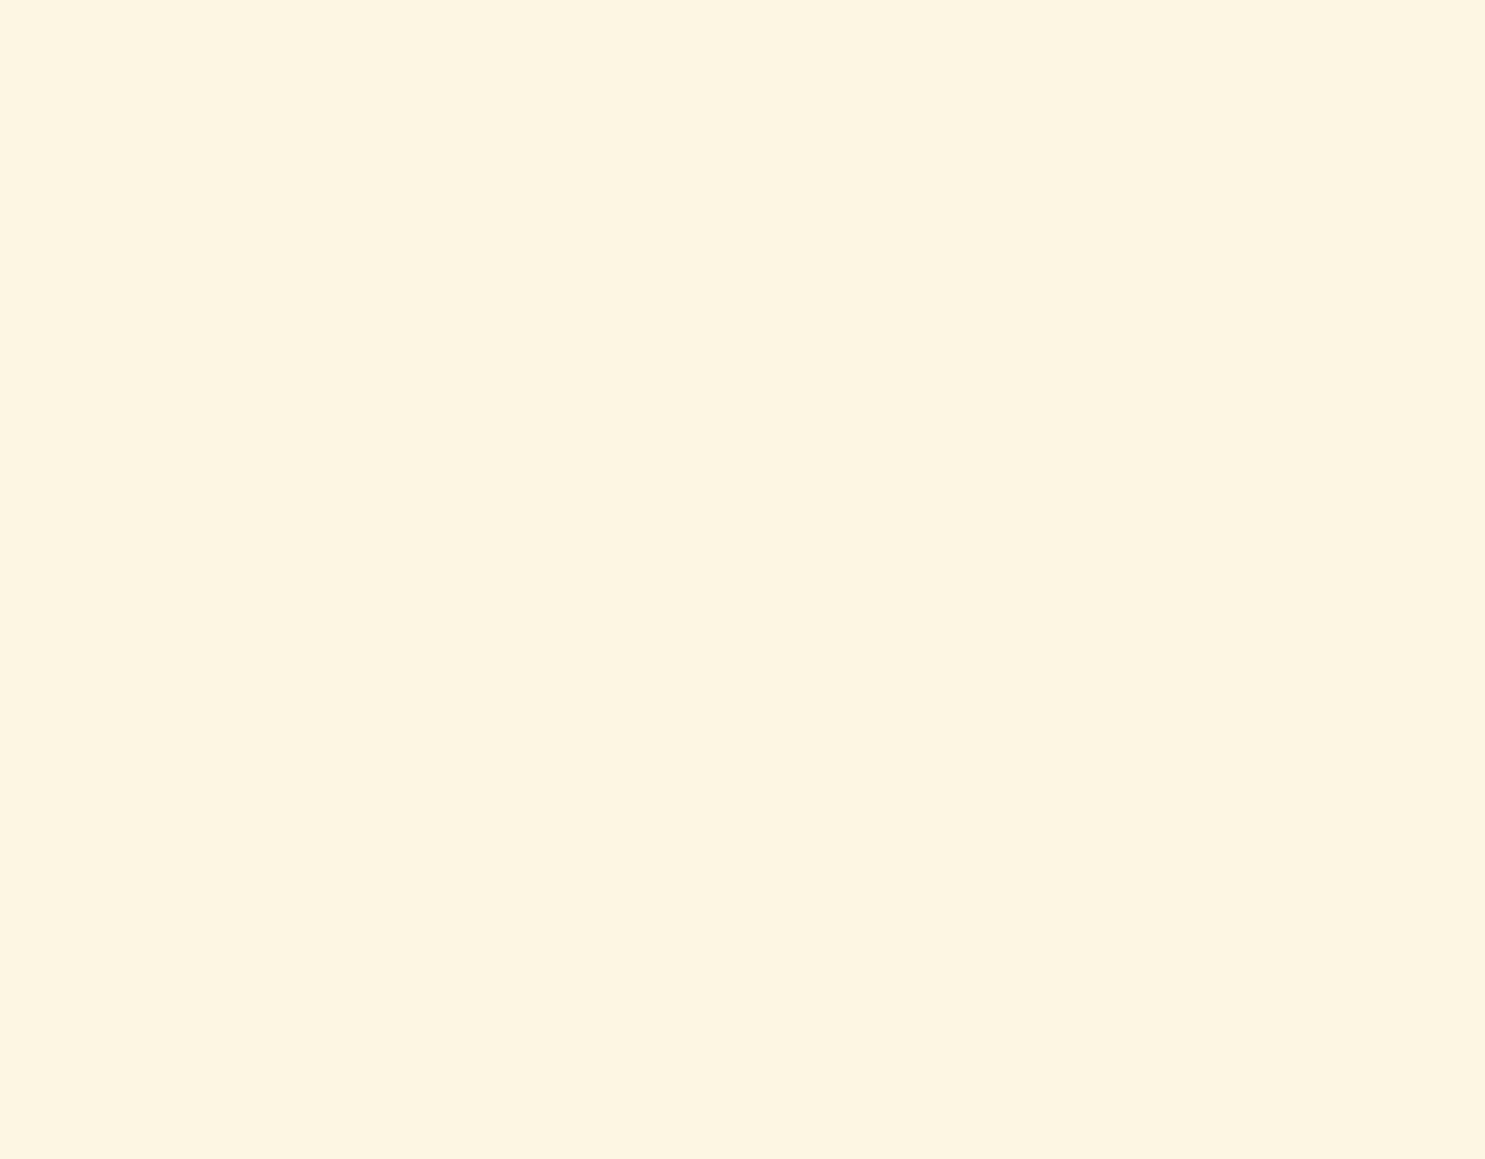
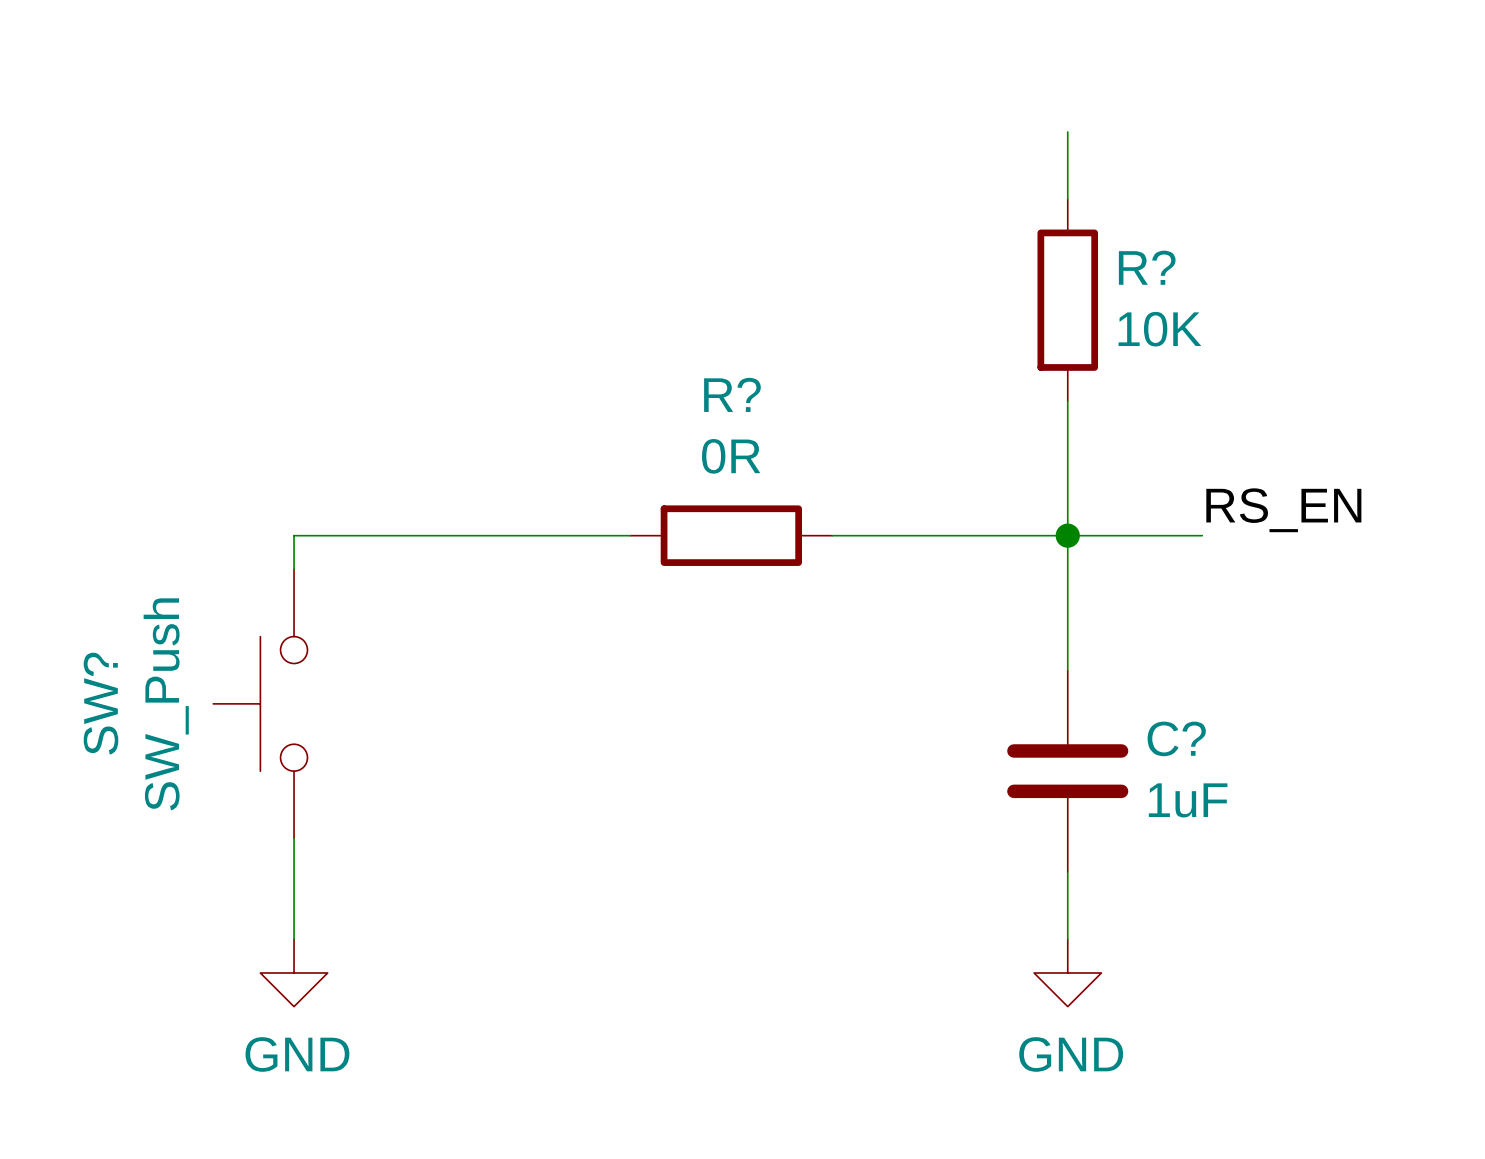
wire: none -> (1067, 131) (1067, 199)
R?: none -> 10K (1067, 300)
wire: none -> (1067, 401) (1067, 670)
label: none -> RS_EN (1283, 510)
wire: none -> (630, 535) (294, 535) (294, 569)
R?: none -> 0R (731, 535)
wire: none -> (832, 535) (1202, 535)
junction: none -> (1067, 535)
SW?: none -> SW_Push (260, 703)
C?: none -> 1uF (1067, 771)
wire: none -> (294, 838) (294, 939)
wire: none -> (1067, 872) (1067, 939)
power symbol: none -> GND (294, 973)
power symbol: none -> GND (1067, 973)

